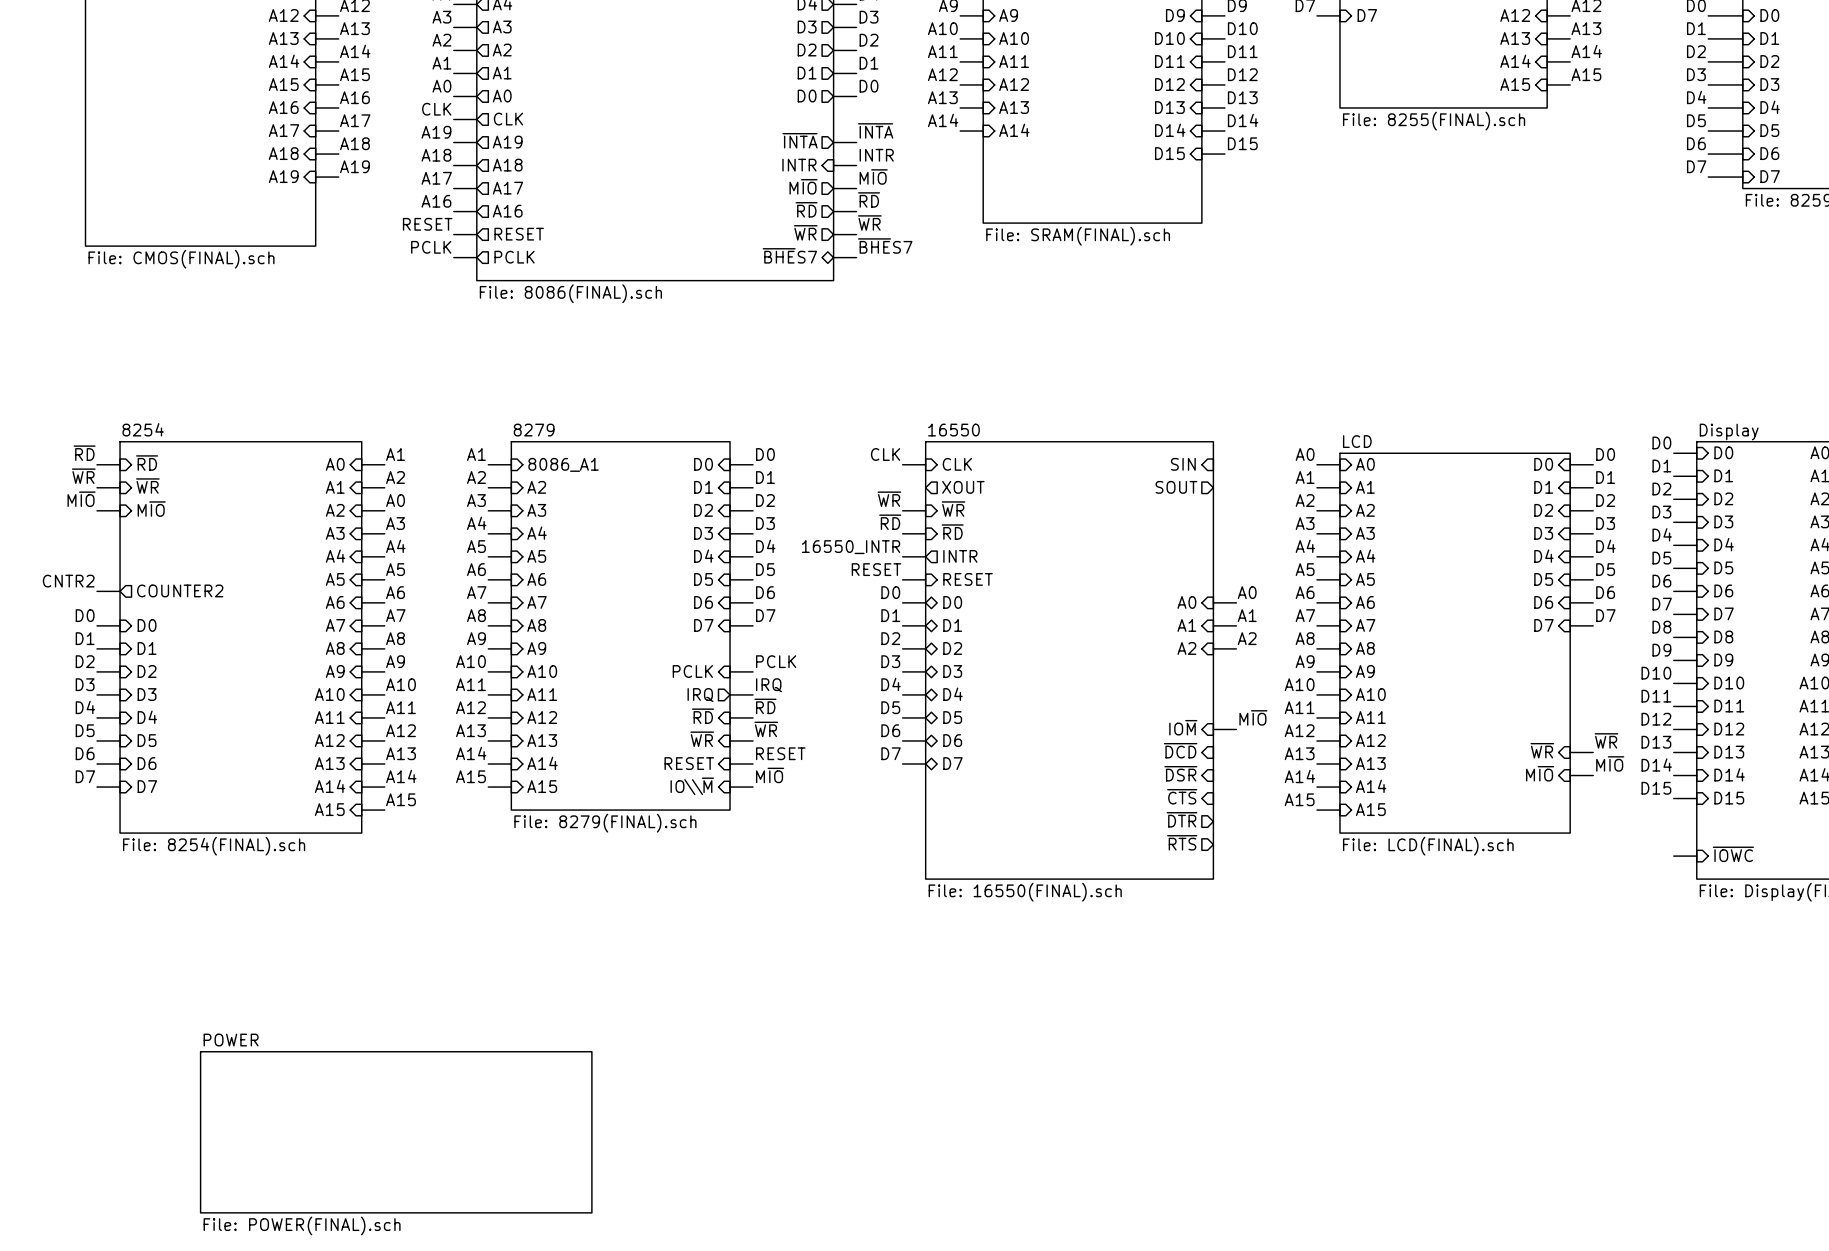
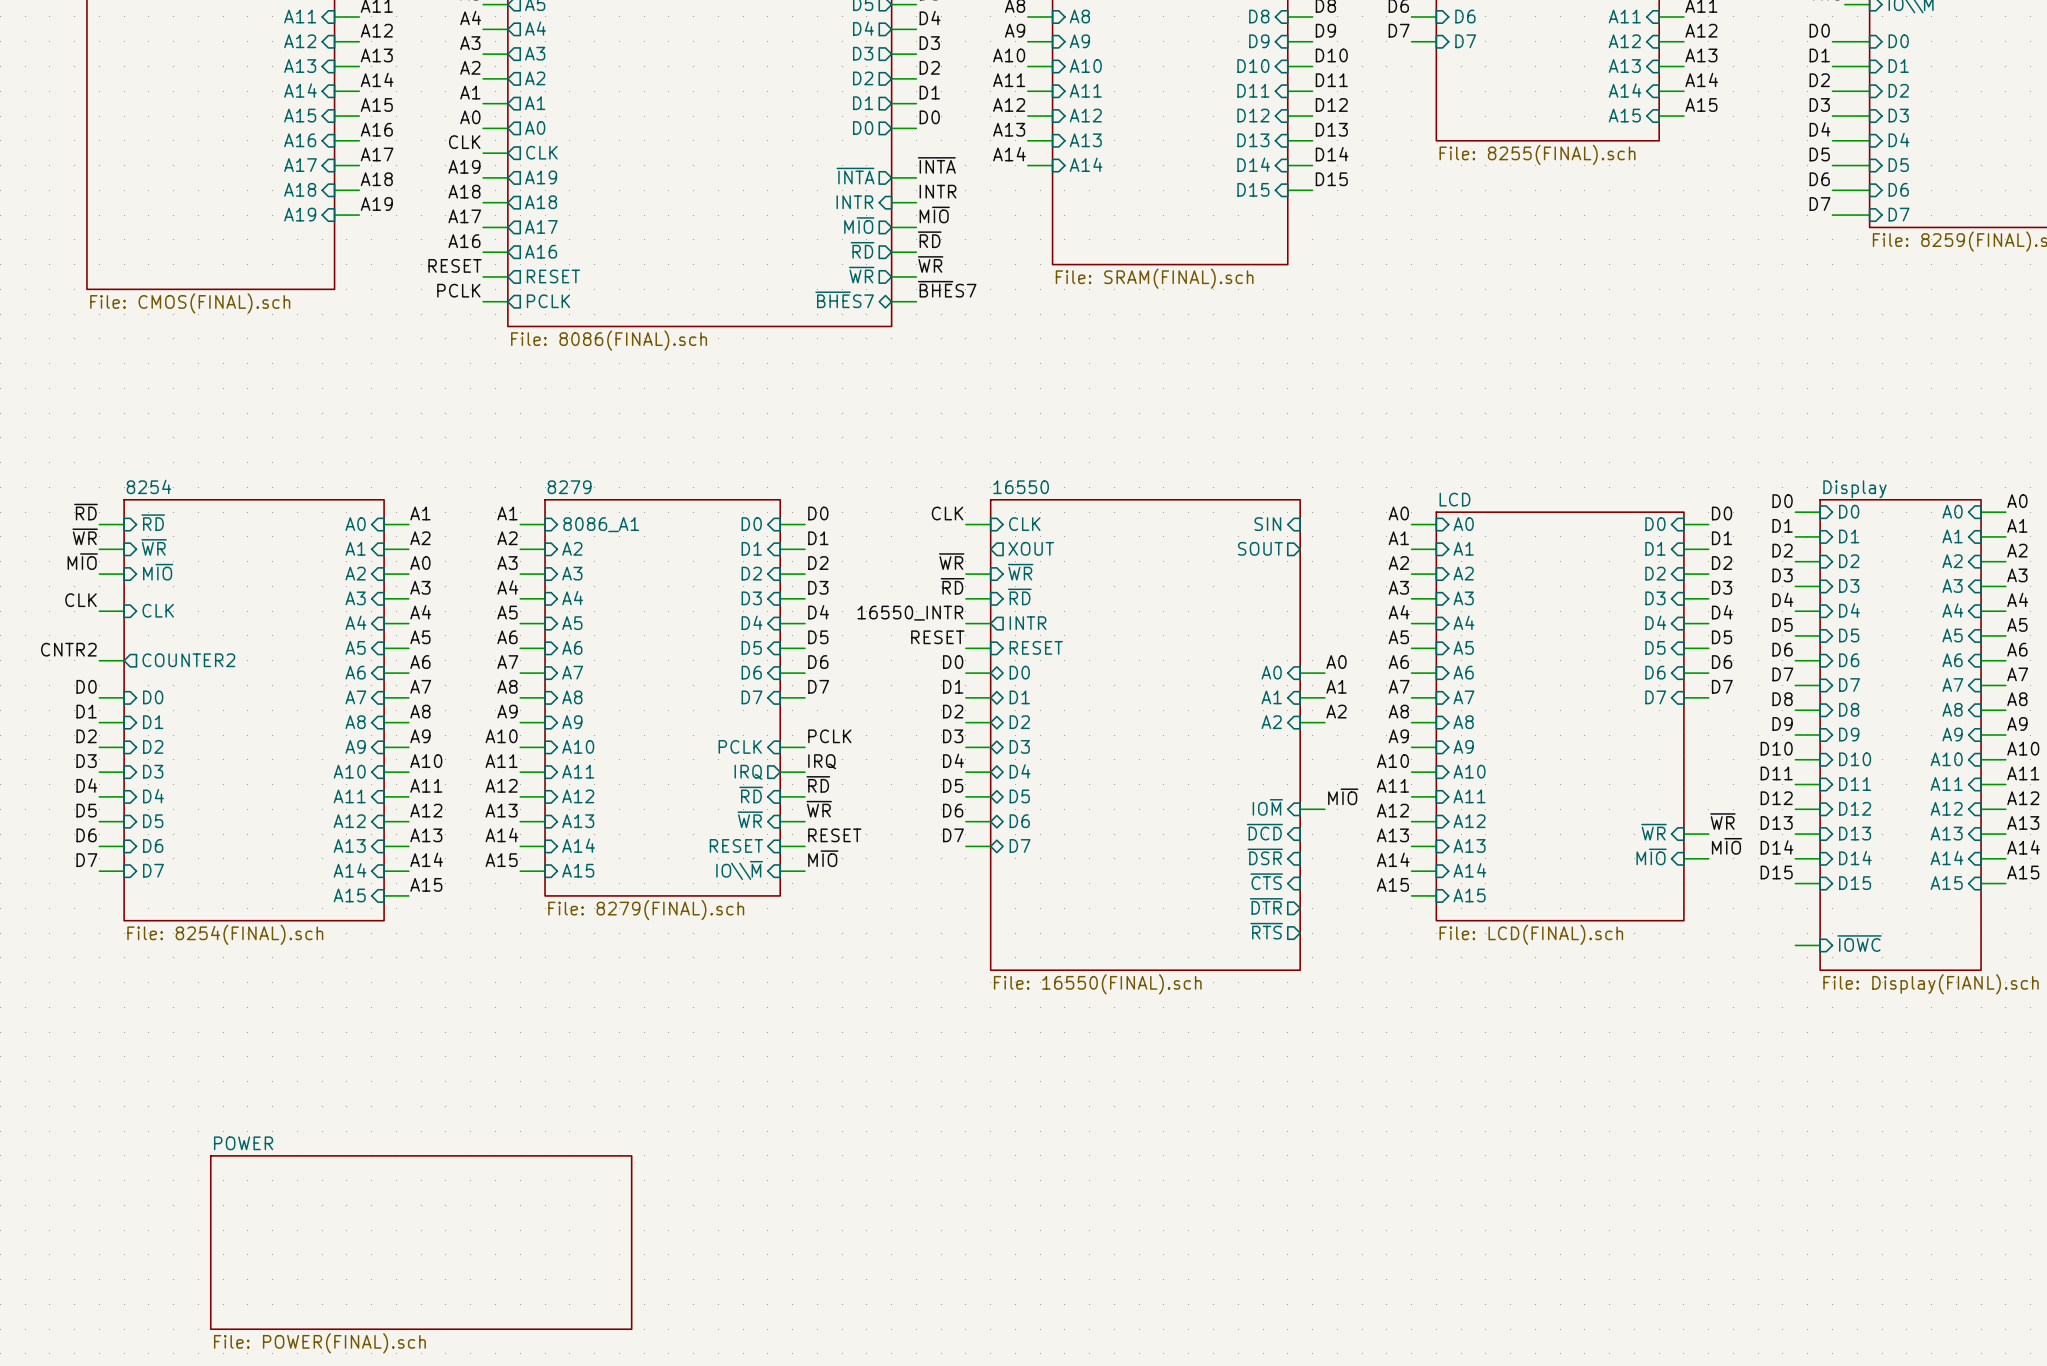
label: none -> CLK (80, 600)
sheet pin: none -> CLK (158, 610)
wire: none -> (99, 611) (124, 611)

